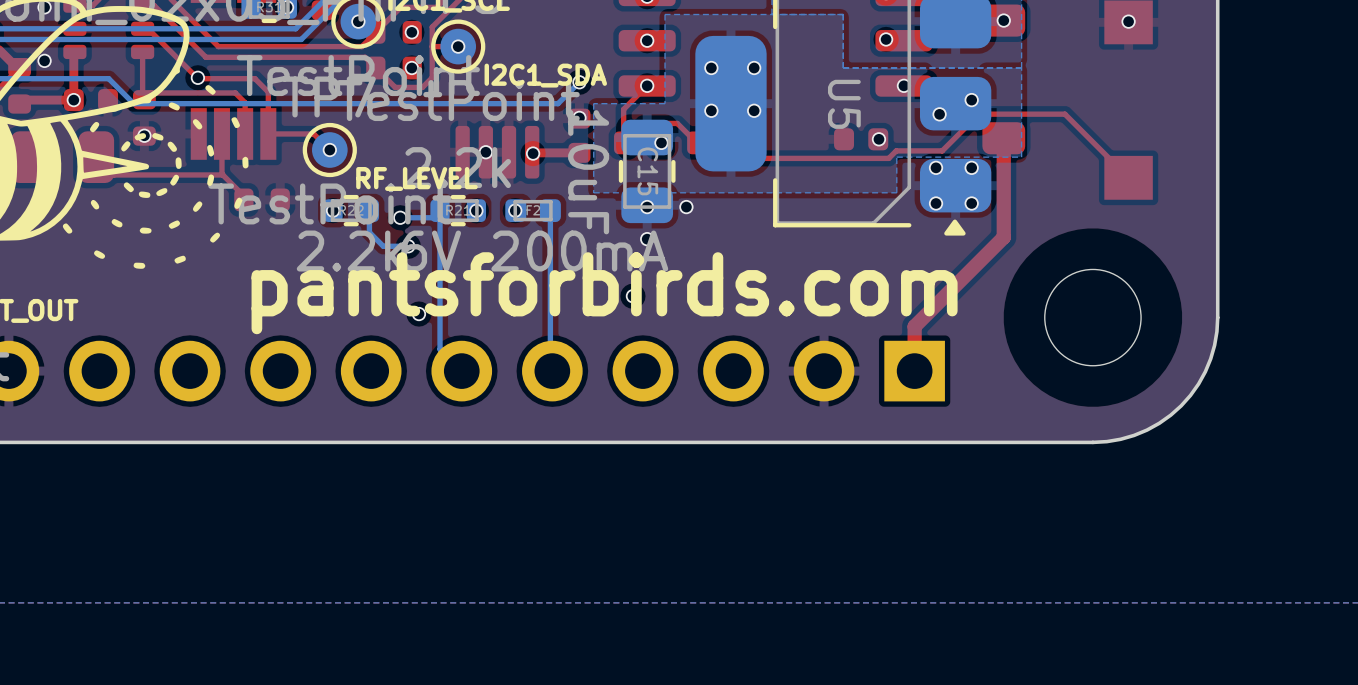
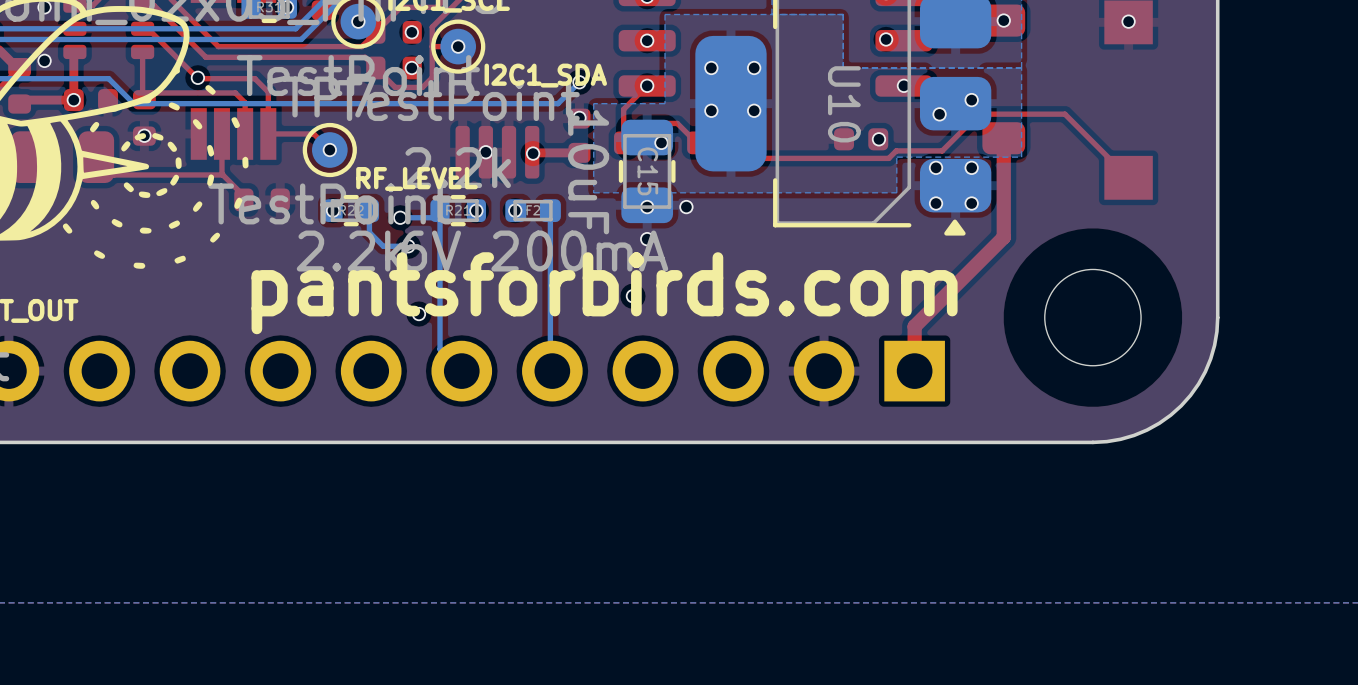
U5 name: U5 (844, 104) -> U10 (844, 104)

